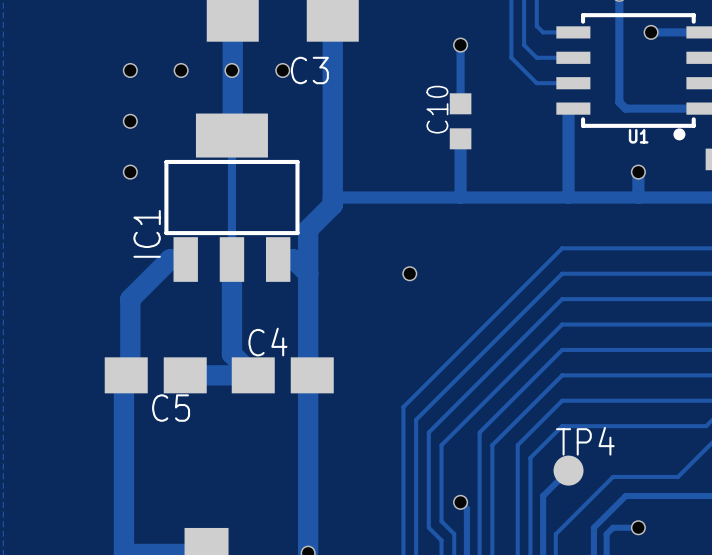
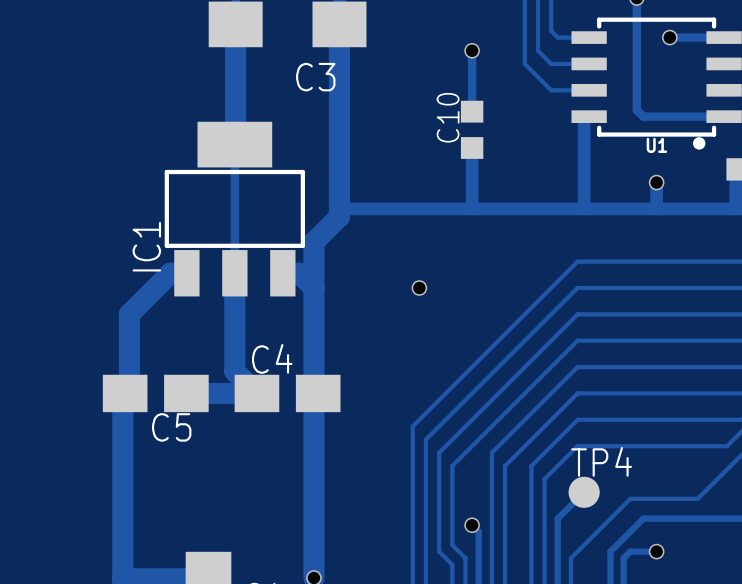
via: (130, 70) -> none
via: (181, 70) -> none
via: (231, 70) -> none
via: (282, 70) -> none
via: (130, 121) -> none
via: (130, 172) -> none

